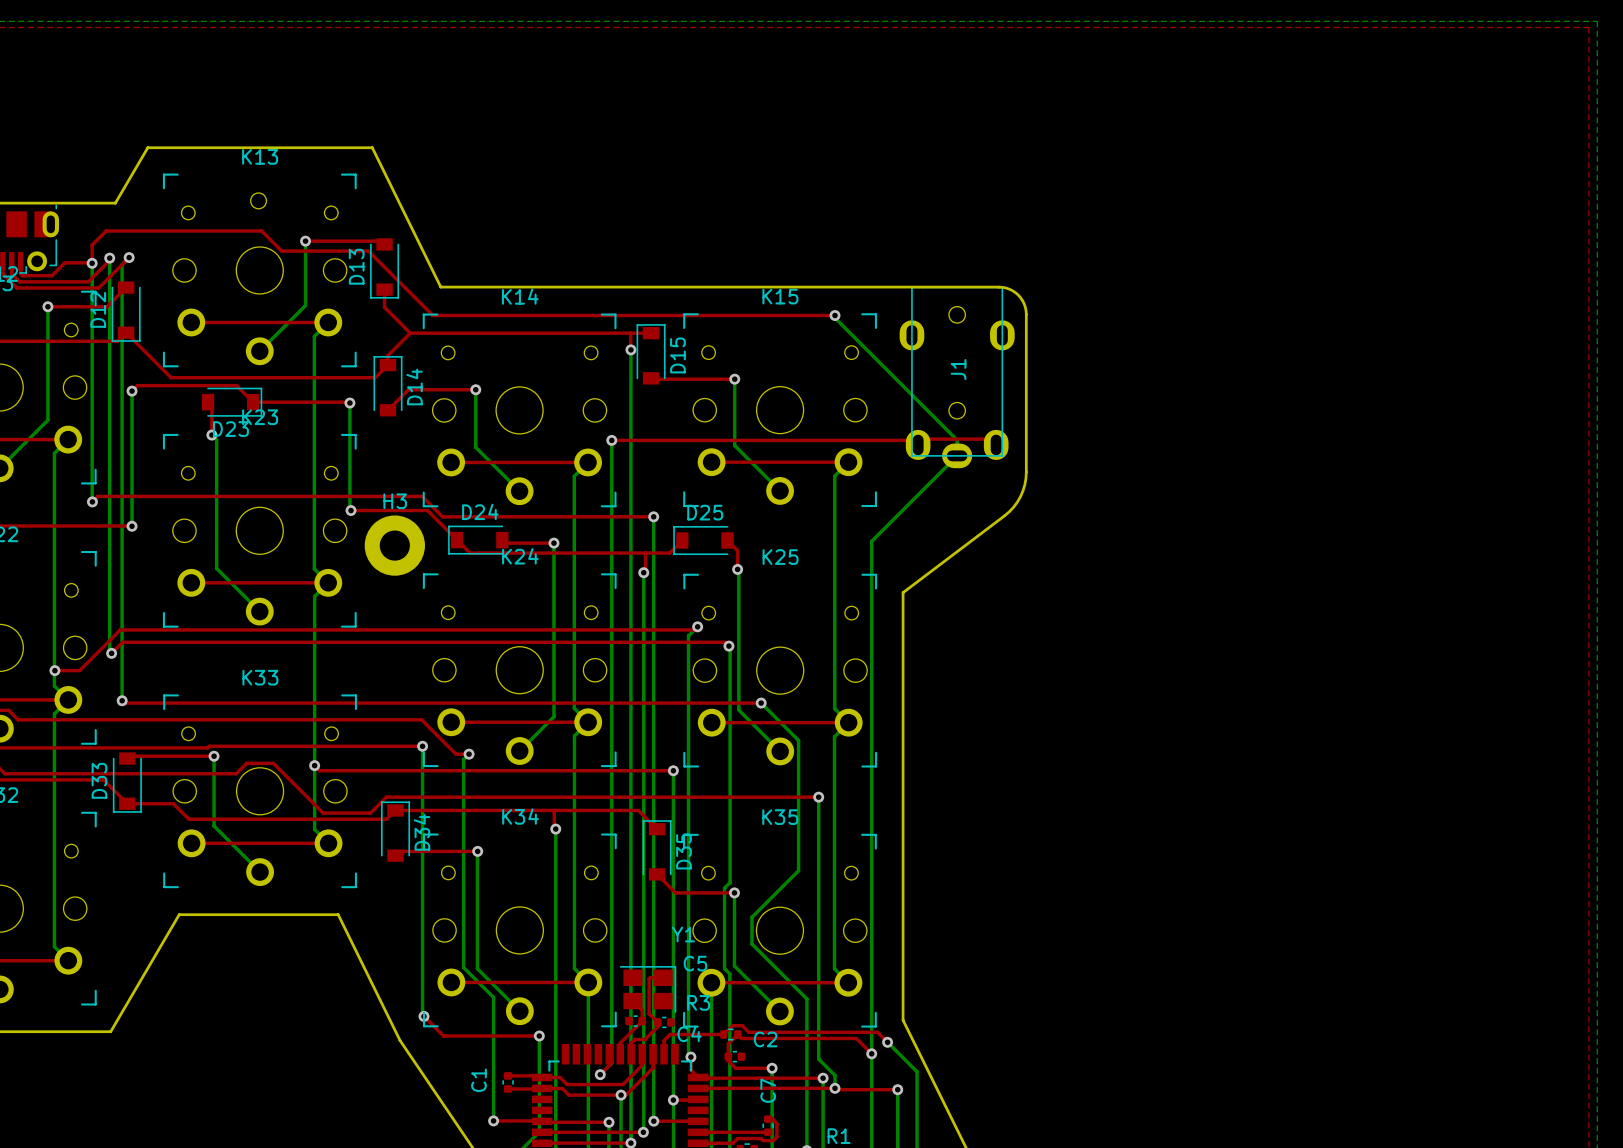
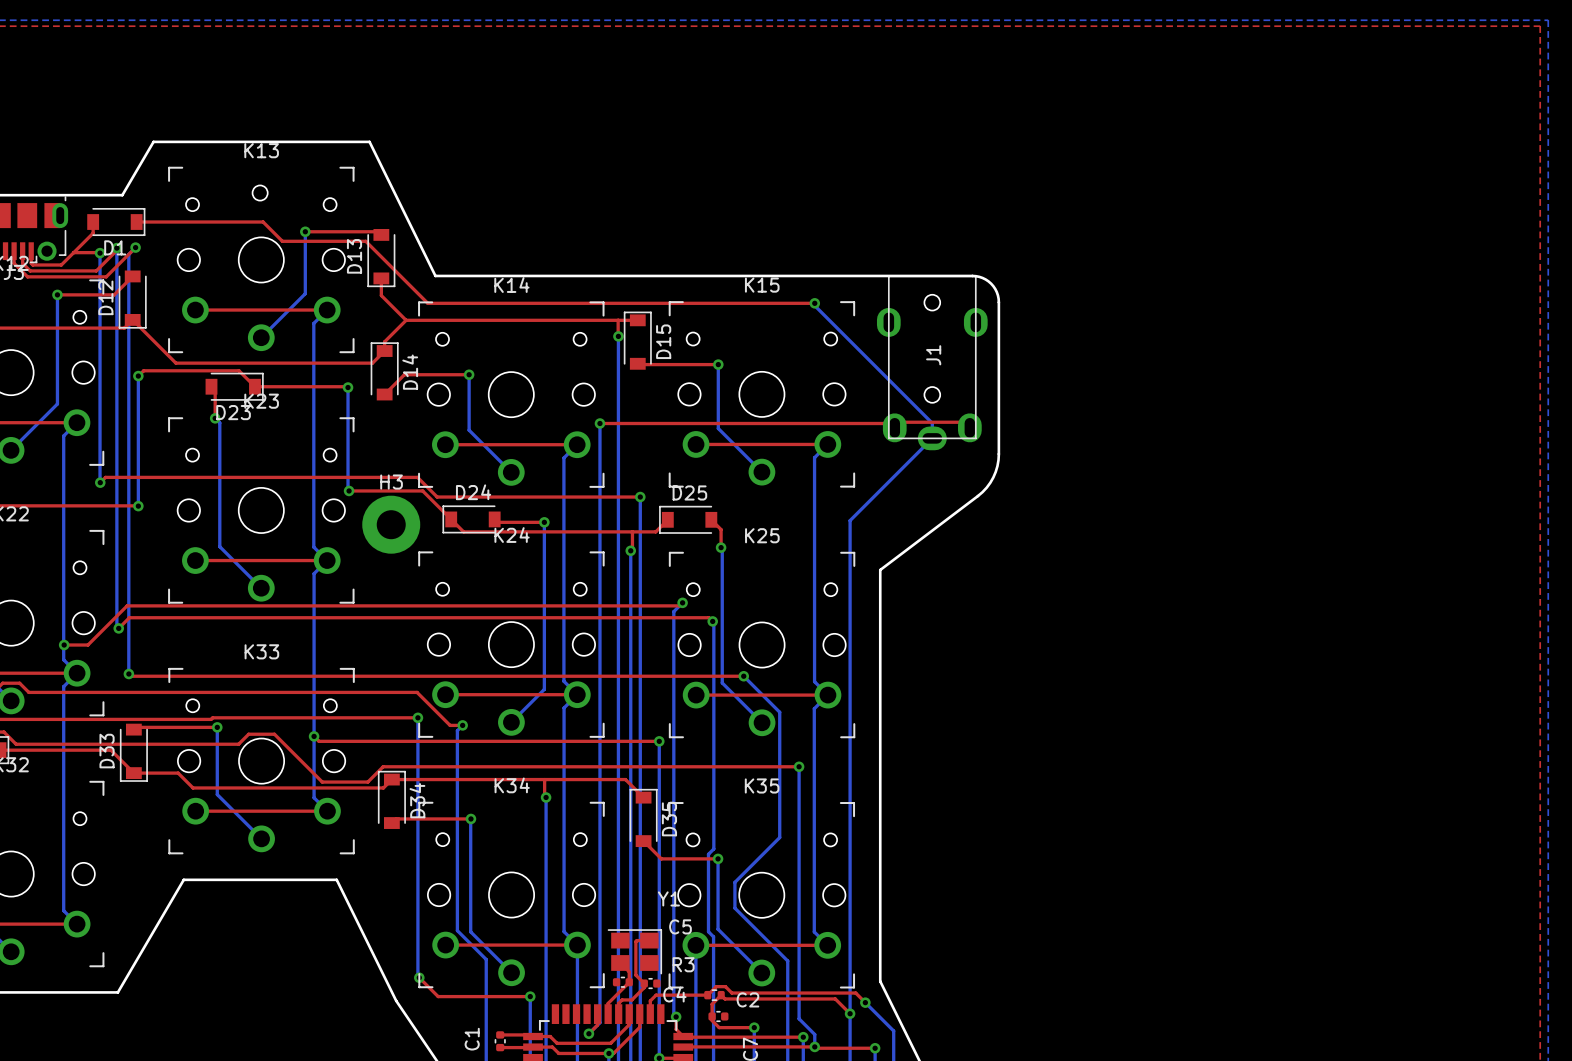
top track: none -> (93, 222) (93, 233) (73, 252)
D1: none -> (116, 222)
top track: (130, 231) (106, 231) (92, 244) (92, 263) -> none

